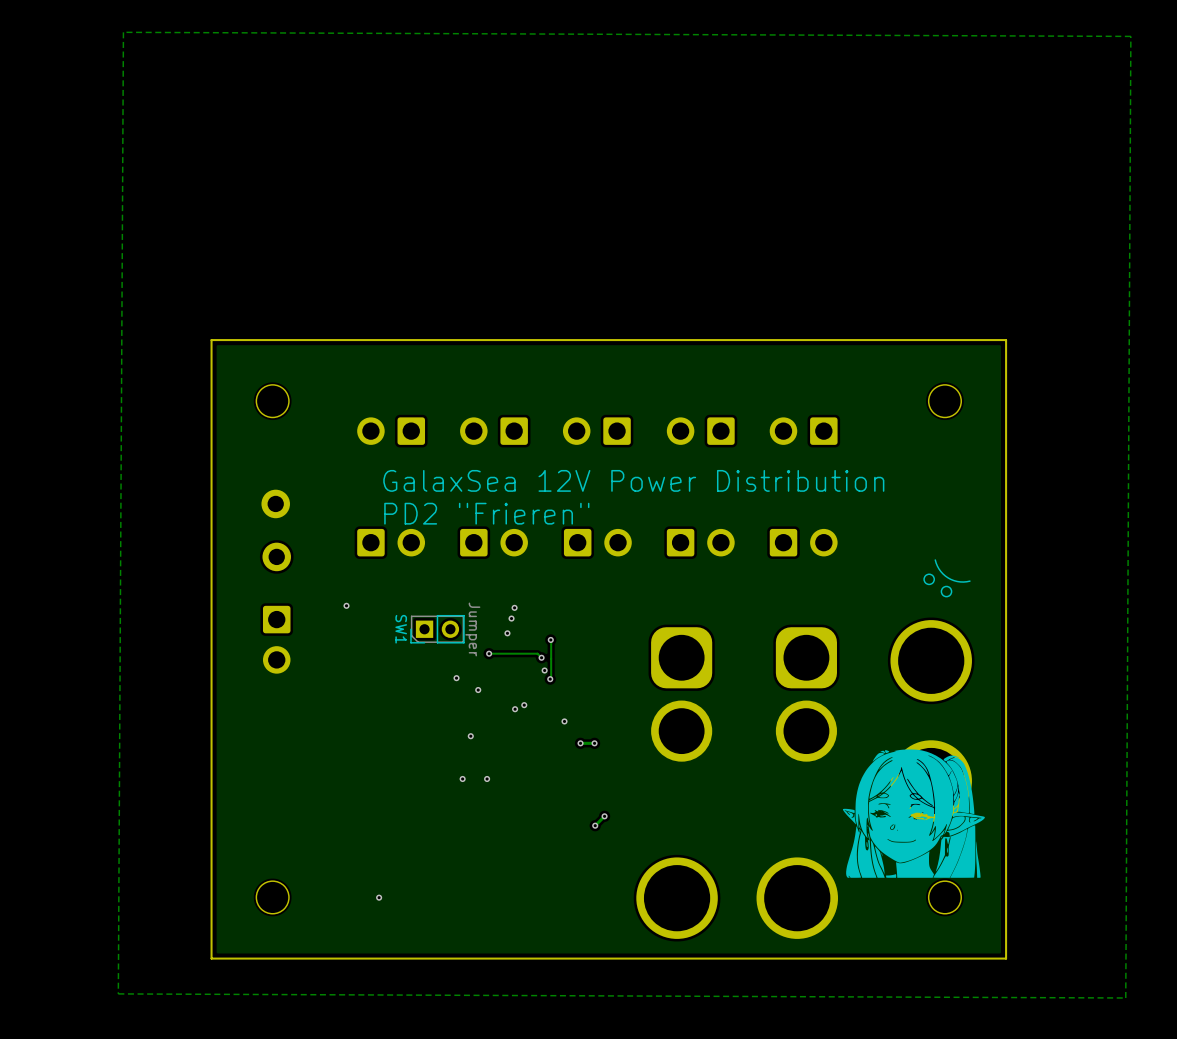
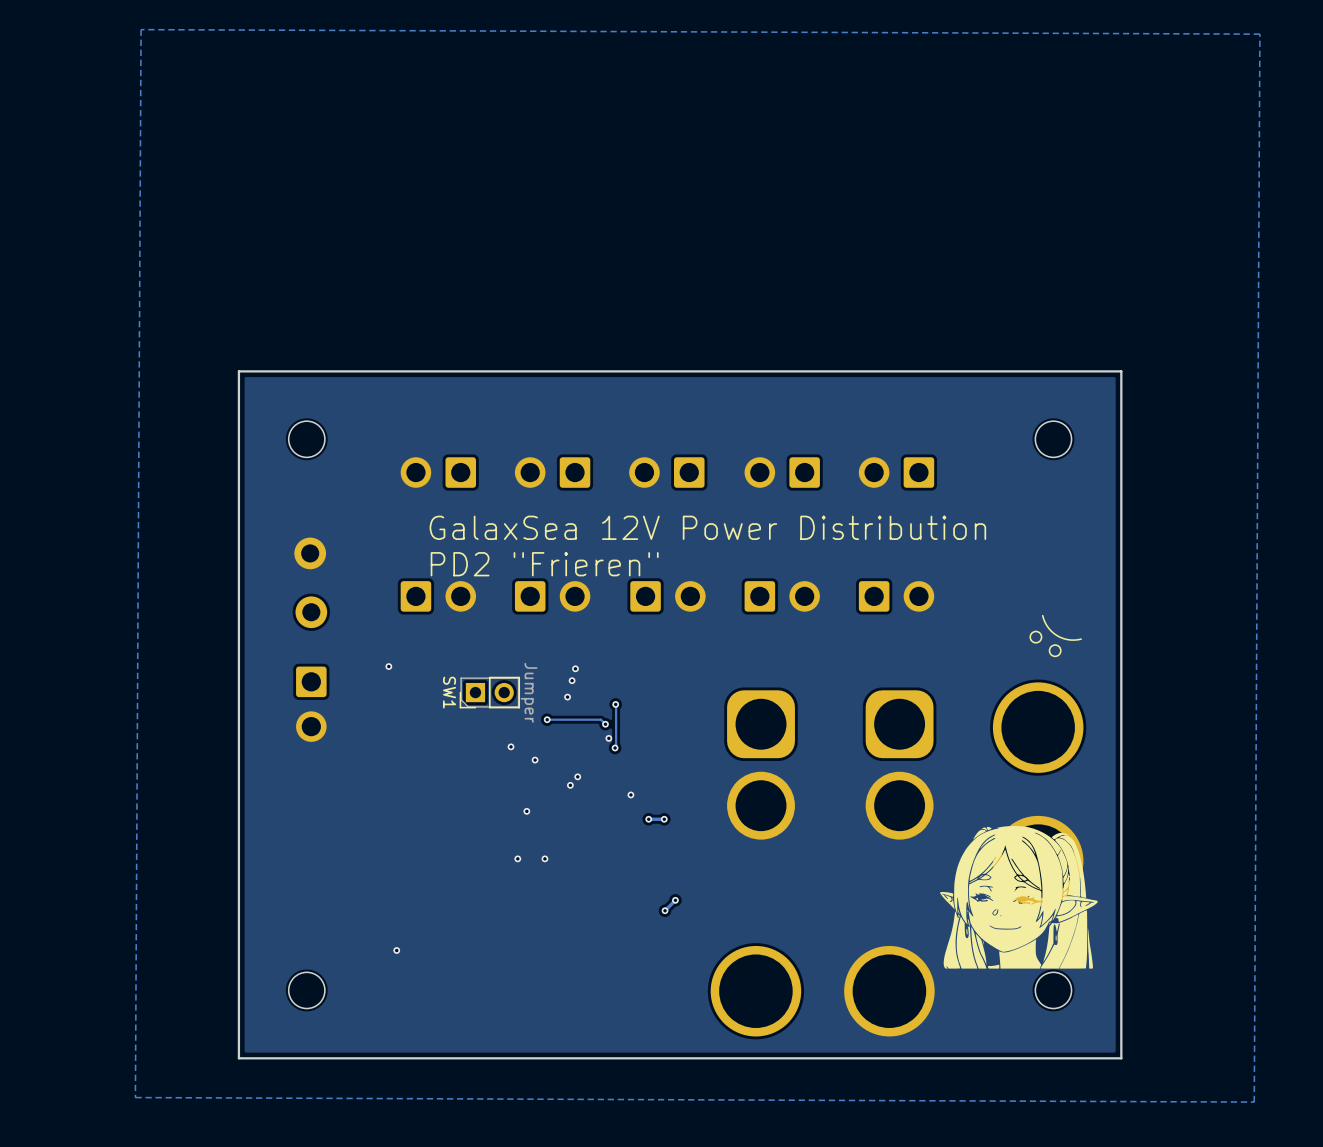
via: none -> (577, 776)
via: (524, 705) -> none
via: (515, 709) -> none
via: none -> (570, 785)
via position: (379, 897) -> (396, 950)

